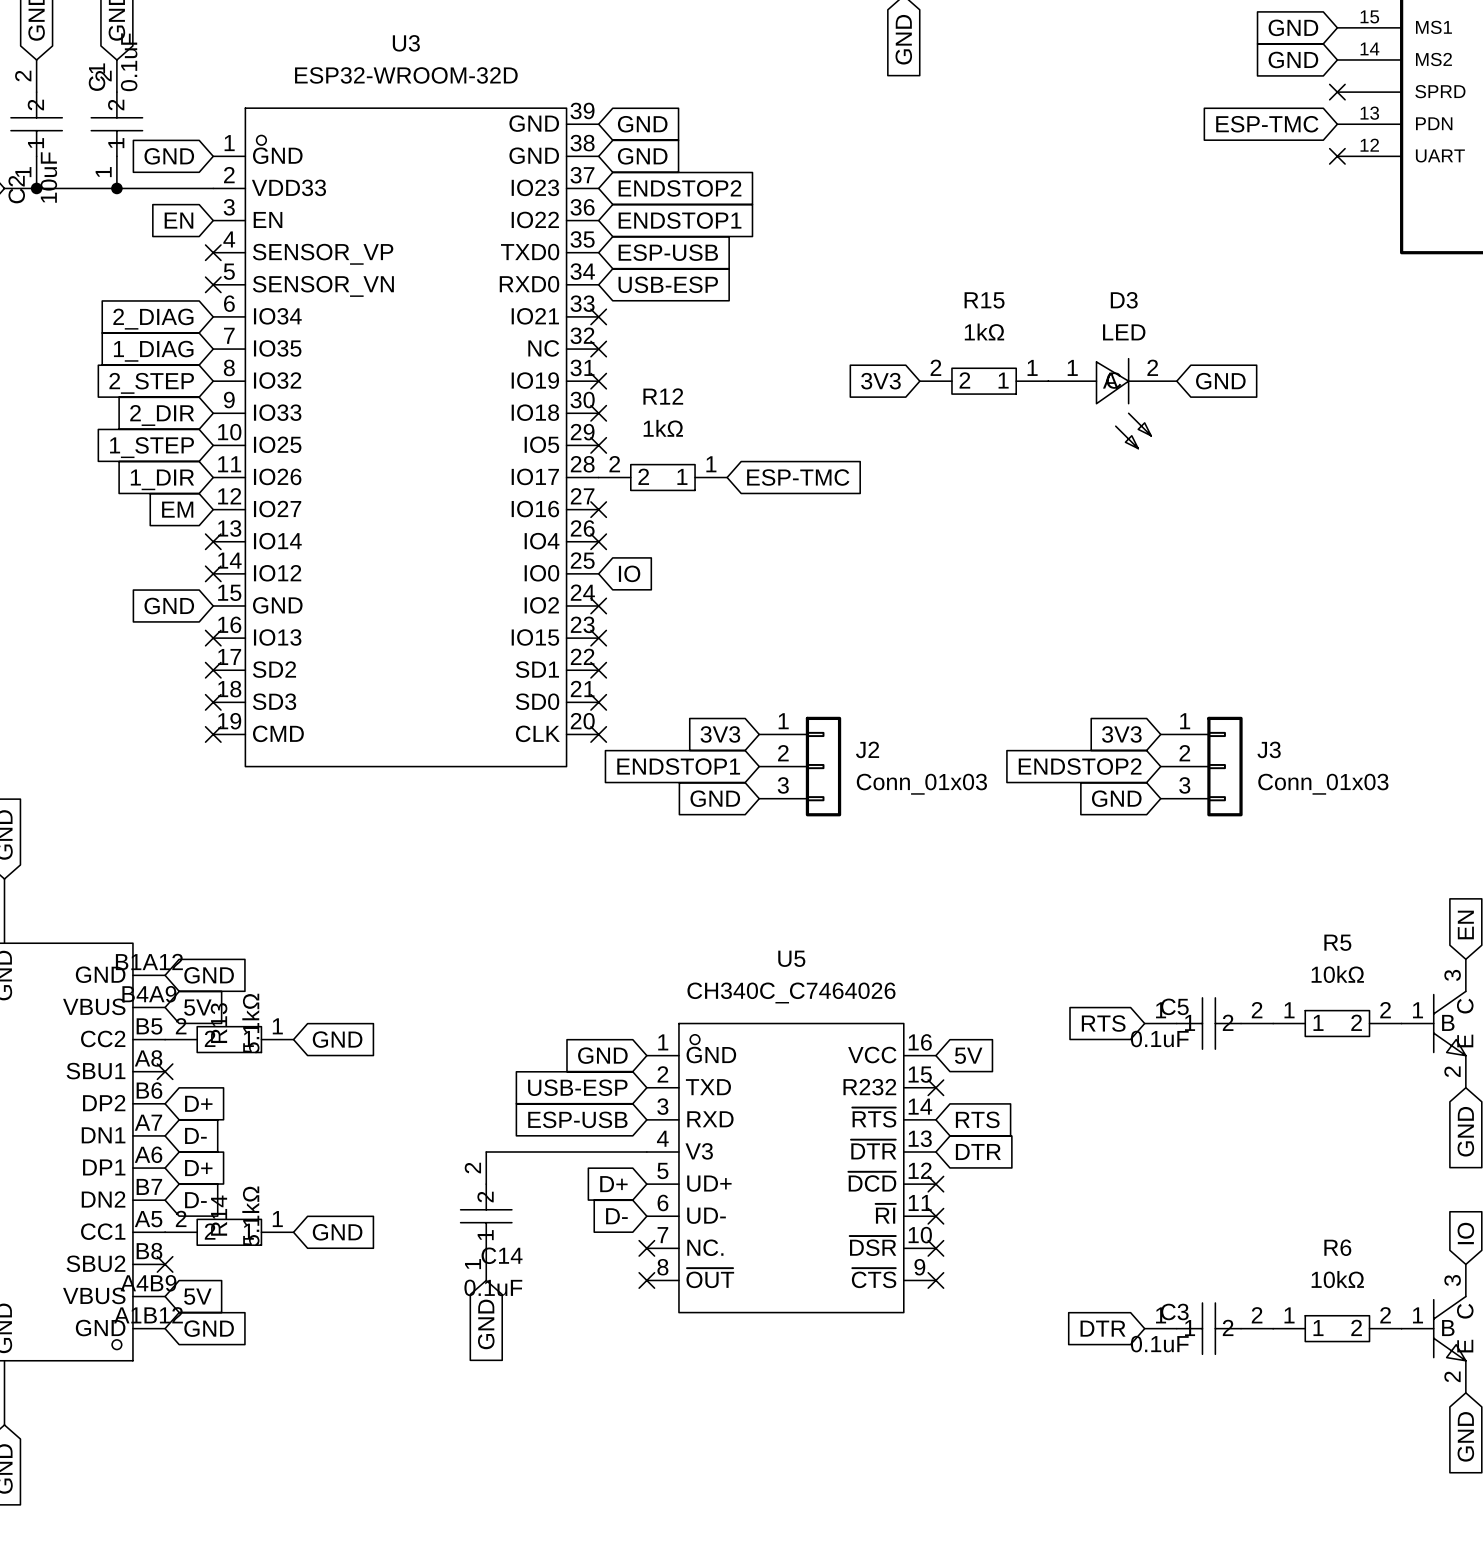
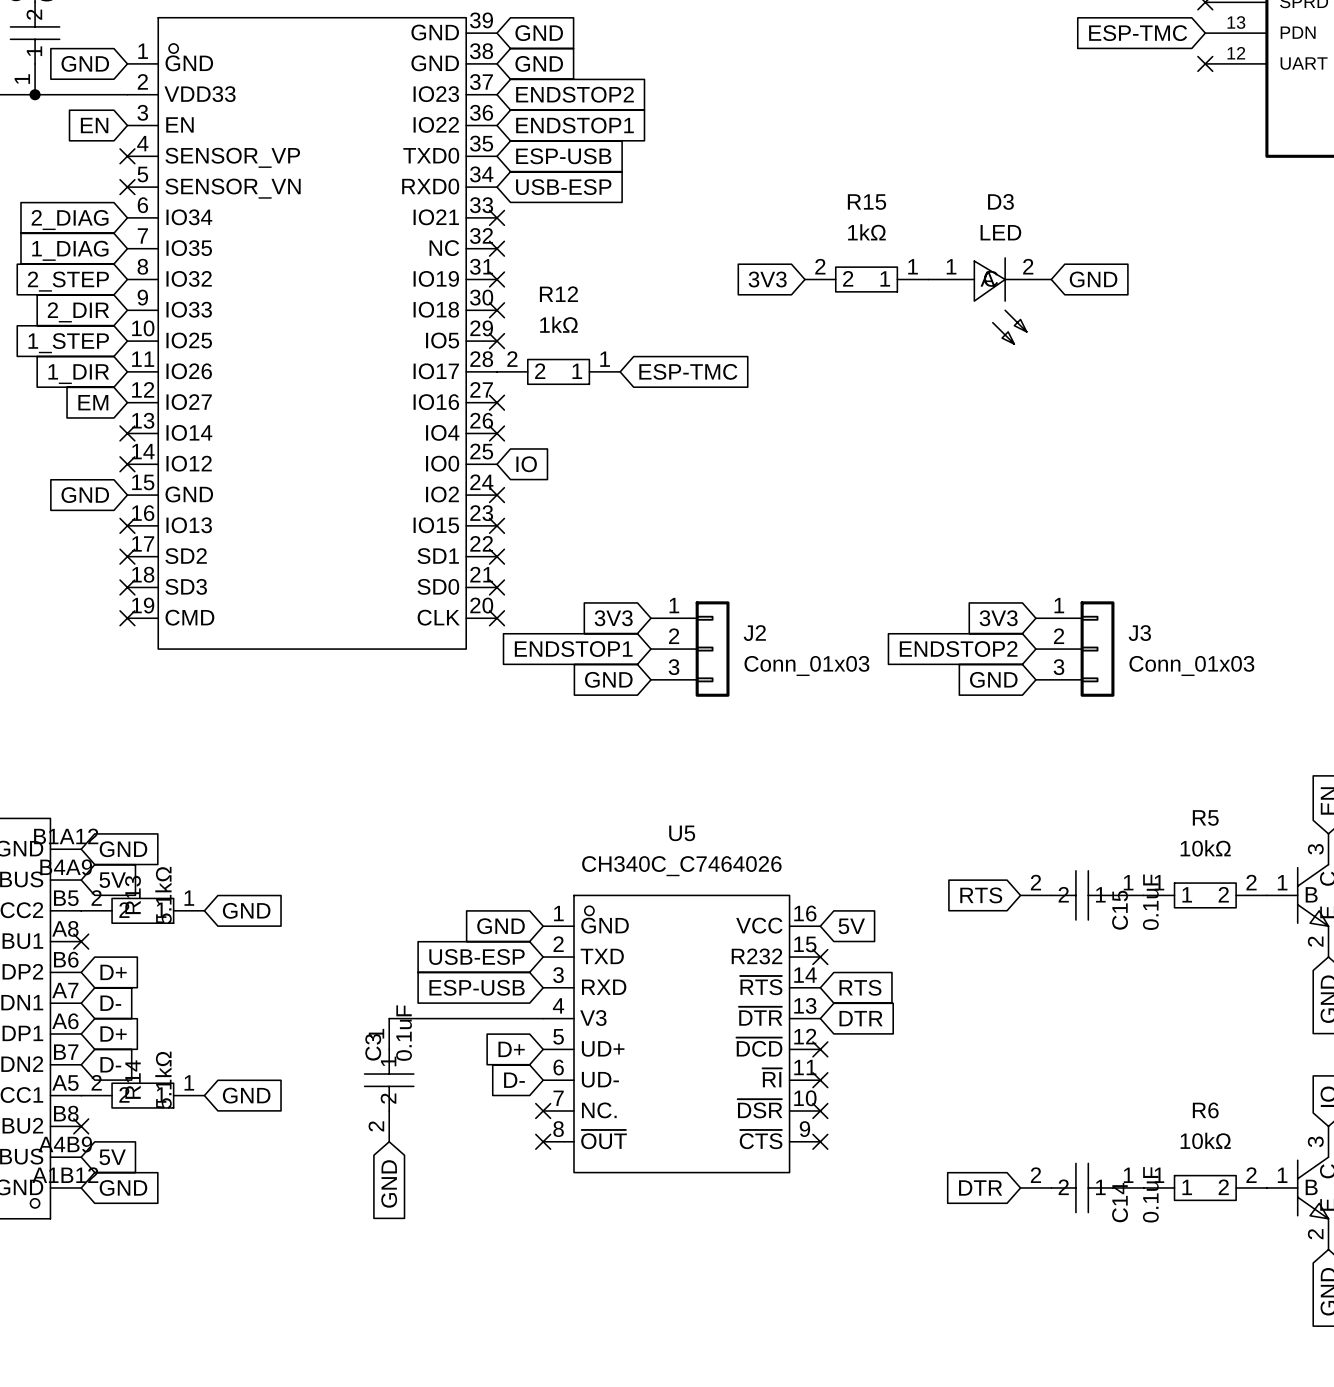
C5 name: C5 (1174, 1006) -> C15 (1120, 910)
C5 rotation: 0° (1208, 1023) -> 180° (1082, 895)
C14 rotation: 0° (486, 1216) -> 90° counterclockwise (1082, 1187)
C14 position: (486, 1216) -> (1082, 1187)
C3 name position: C3 (1174, 1311) -> C3 (373, 1047)
C3 rotation: 0° (1208, 1328) -> 90° clockwise (389, 1080)
C3 position: (1208, 1328) -> (389, 1080)
C3 value position: 0.1uF (1159, 1344) -> 0.1uF (404, 1033)

